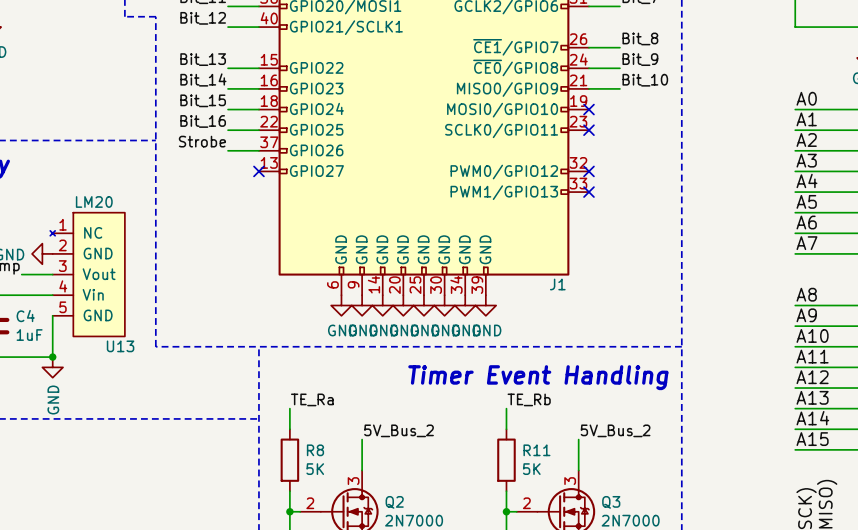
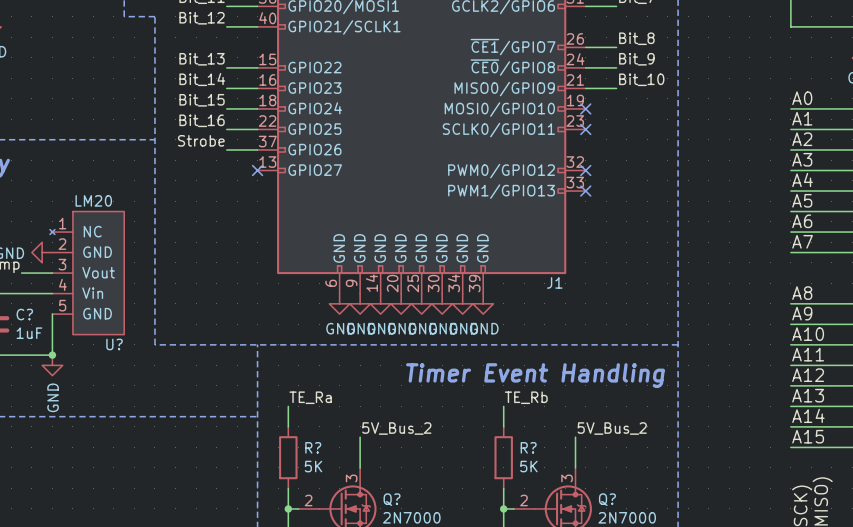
C4 name: C4 (25, 316) -> C? (24, 314)
U13 name: U13 (120, 346) -> U? (114, 344)
R8 name: R8 (315, 450) -> R? (313, 447)
R11 name: R11 (536, 450) -> R? (528, 447)
Q2 name: Q2 (394, 502) -> Q? (392, 499)
Q3 name: Q3 (611, 502) -> Q? (607, 499)

